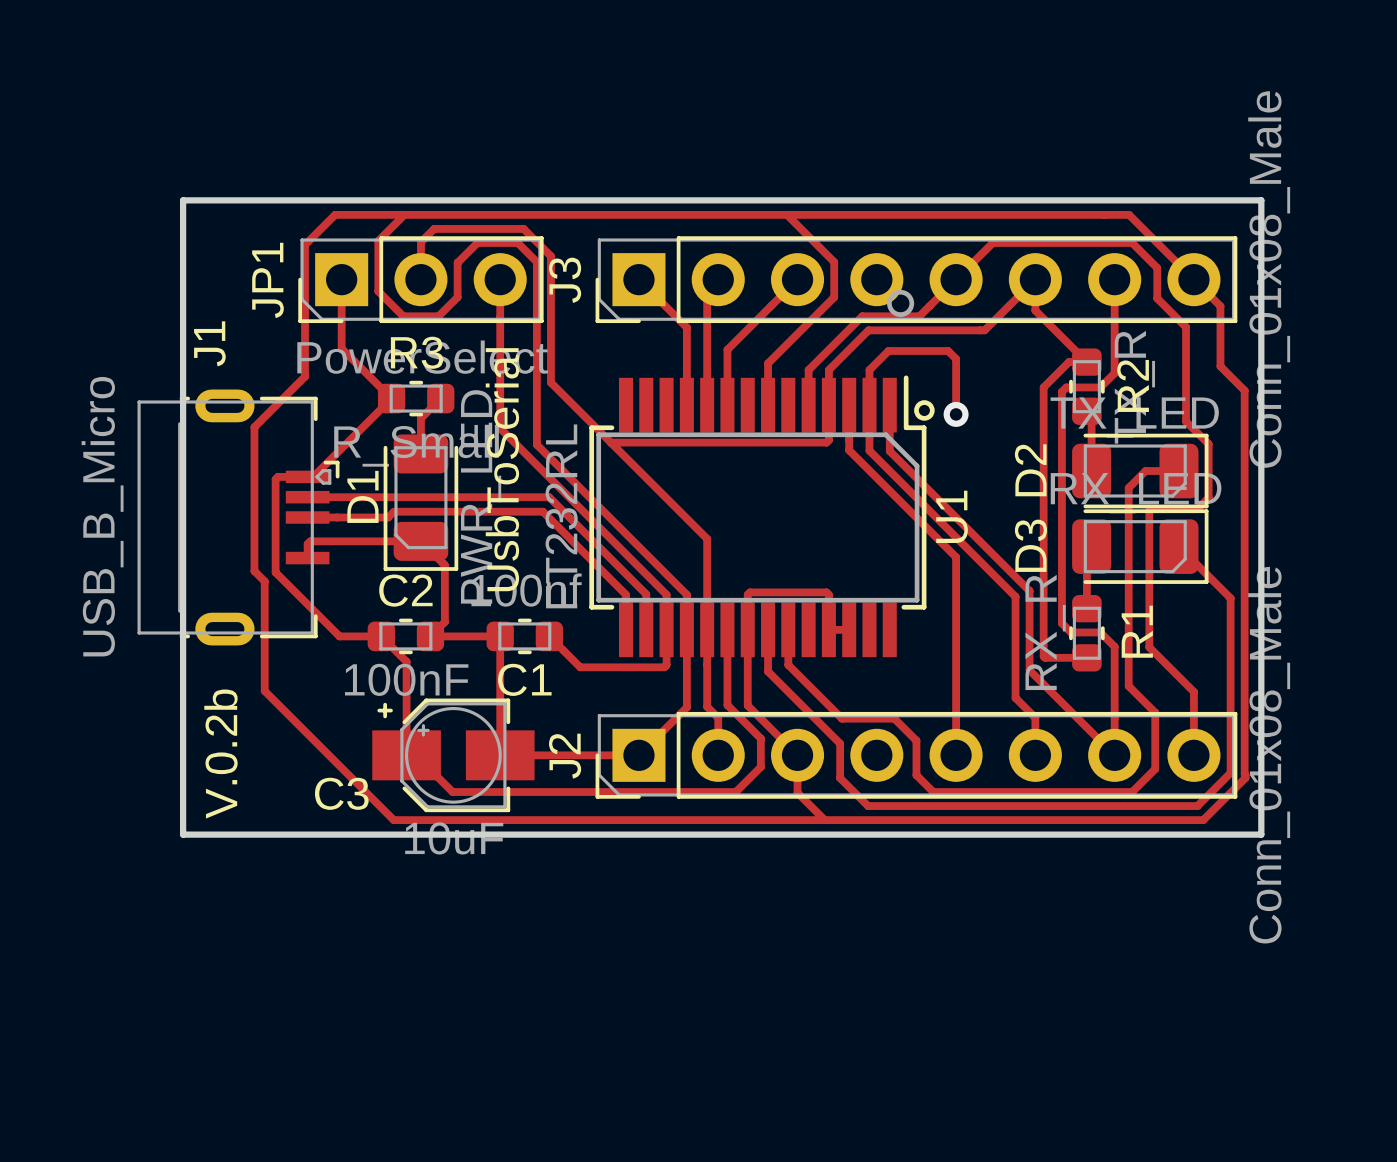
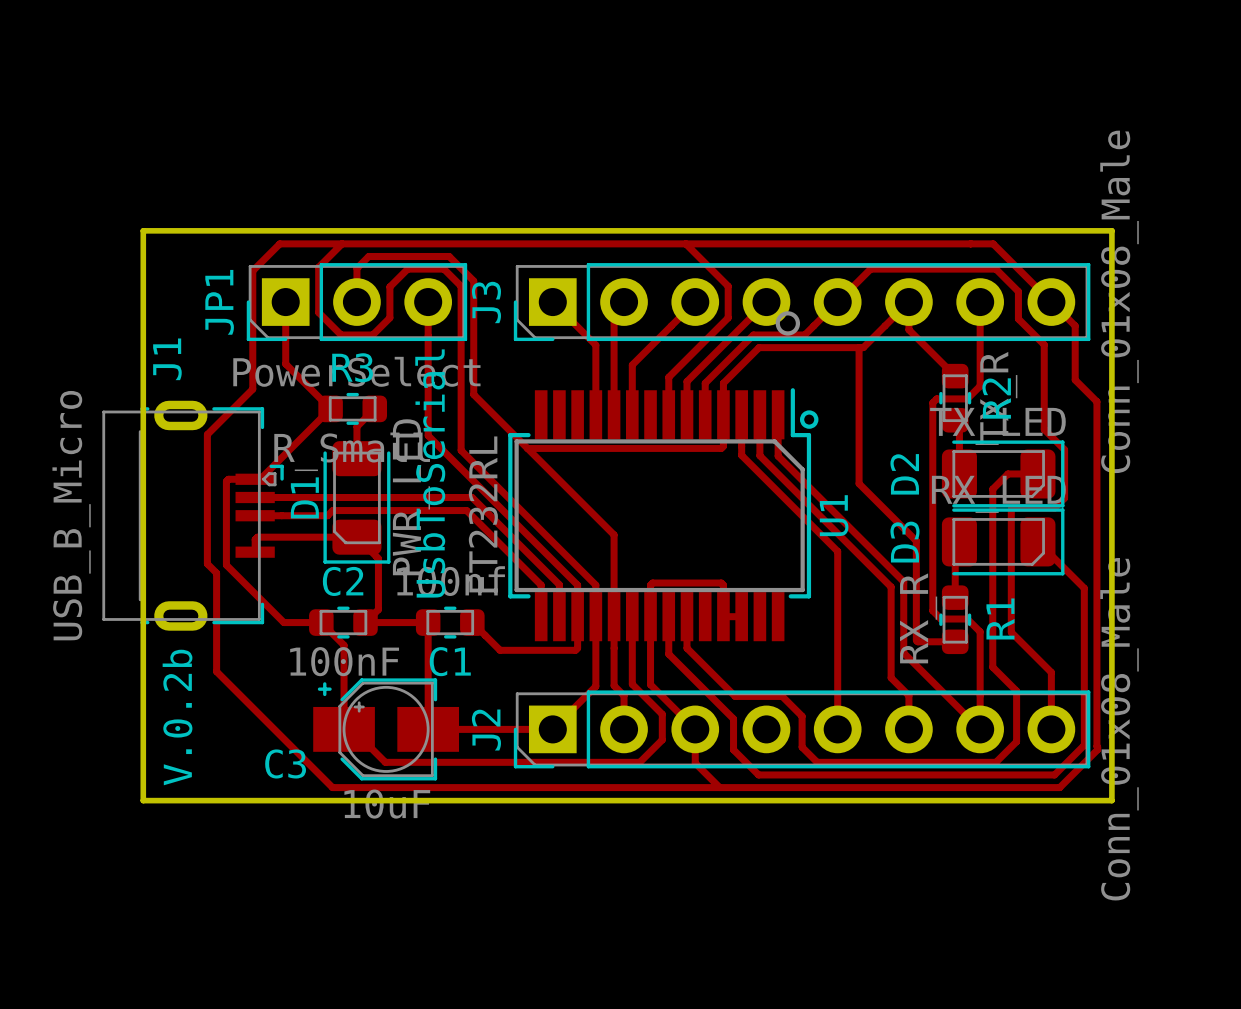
track: none -> (766, 302) (686, 381) (686, 414)
track: (1086, 362) (1068, 362) (1043, 387) (1043, 545) -> (859, 347) (859, 483) (916, 540)
track: (869, 405) (869, 370) (888, 351) (948, 351) (956, 358) (956, 414) -> none
via: (956, 414) -> none

